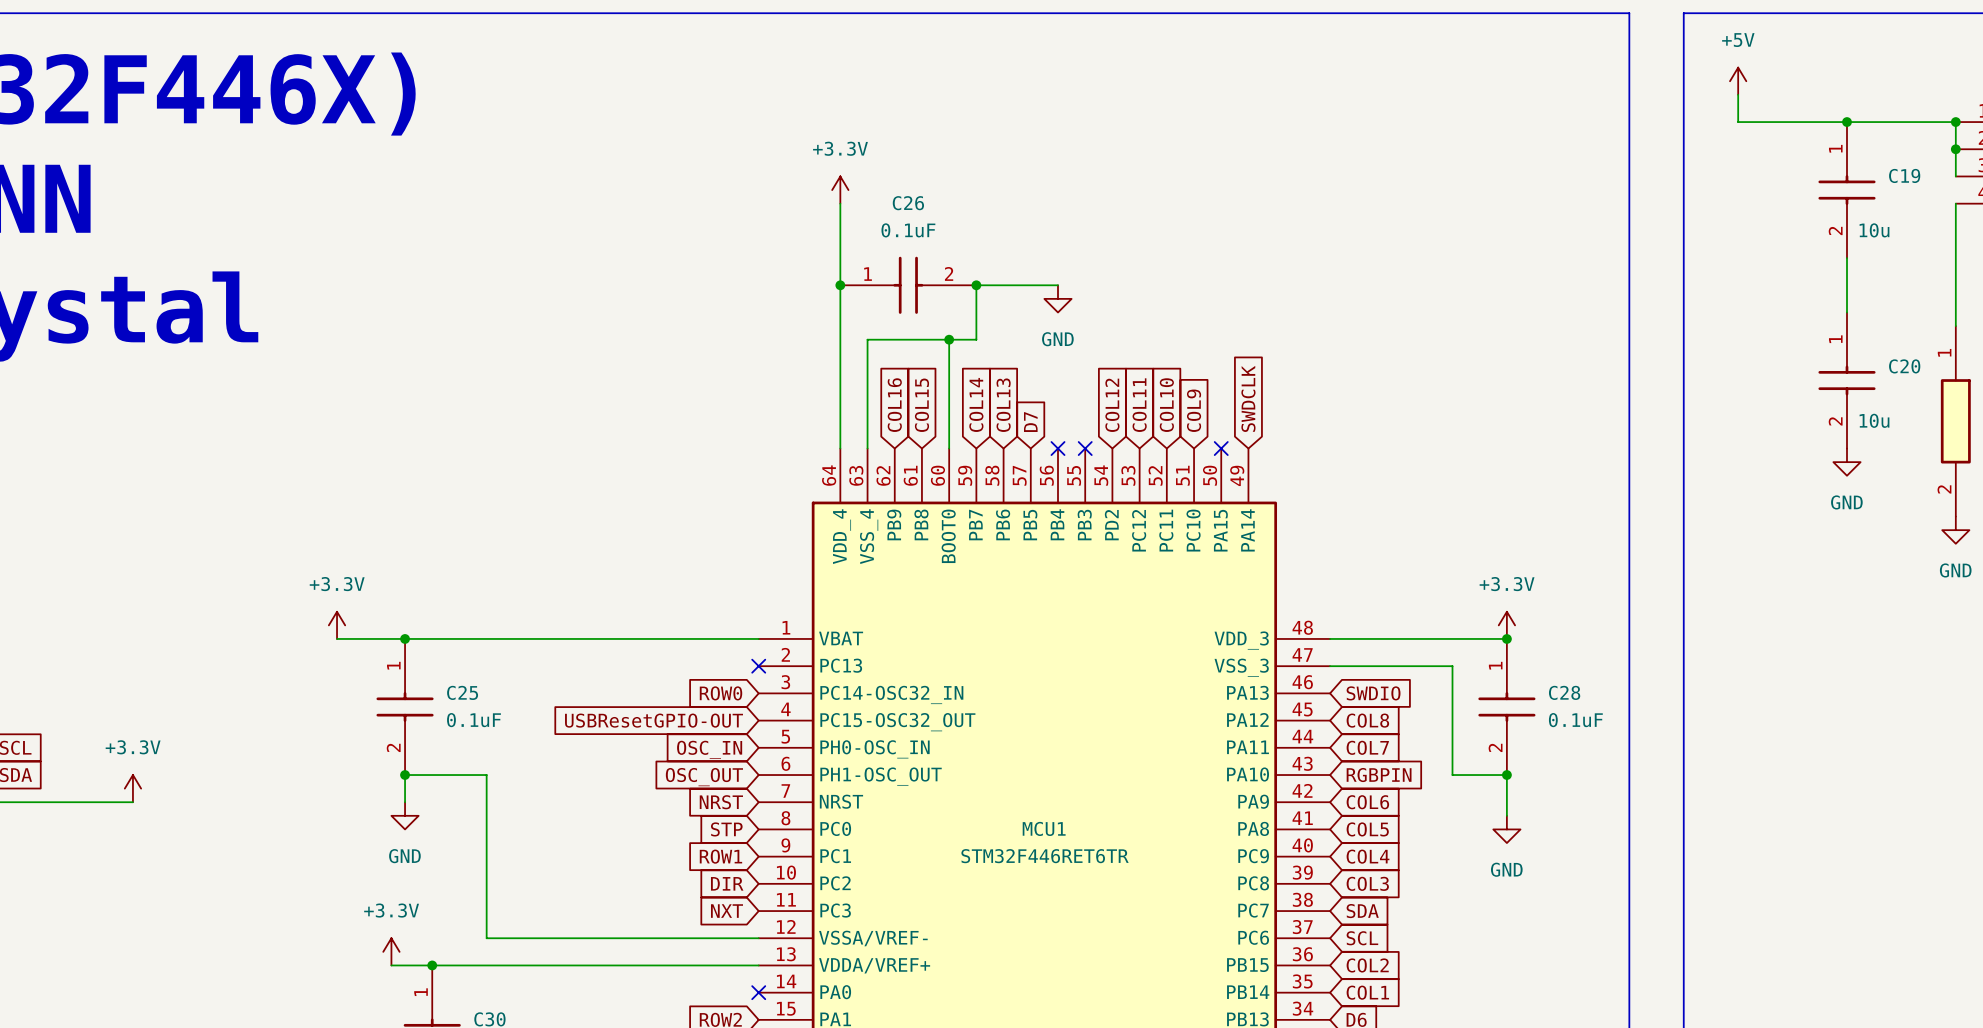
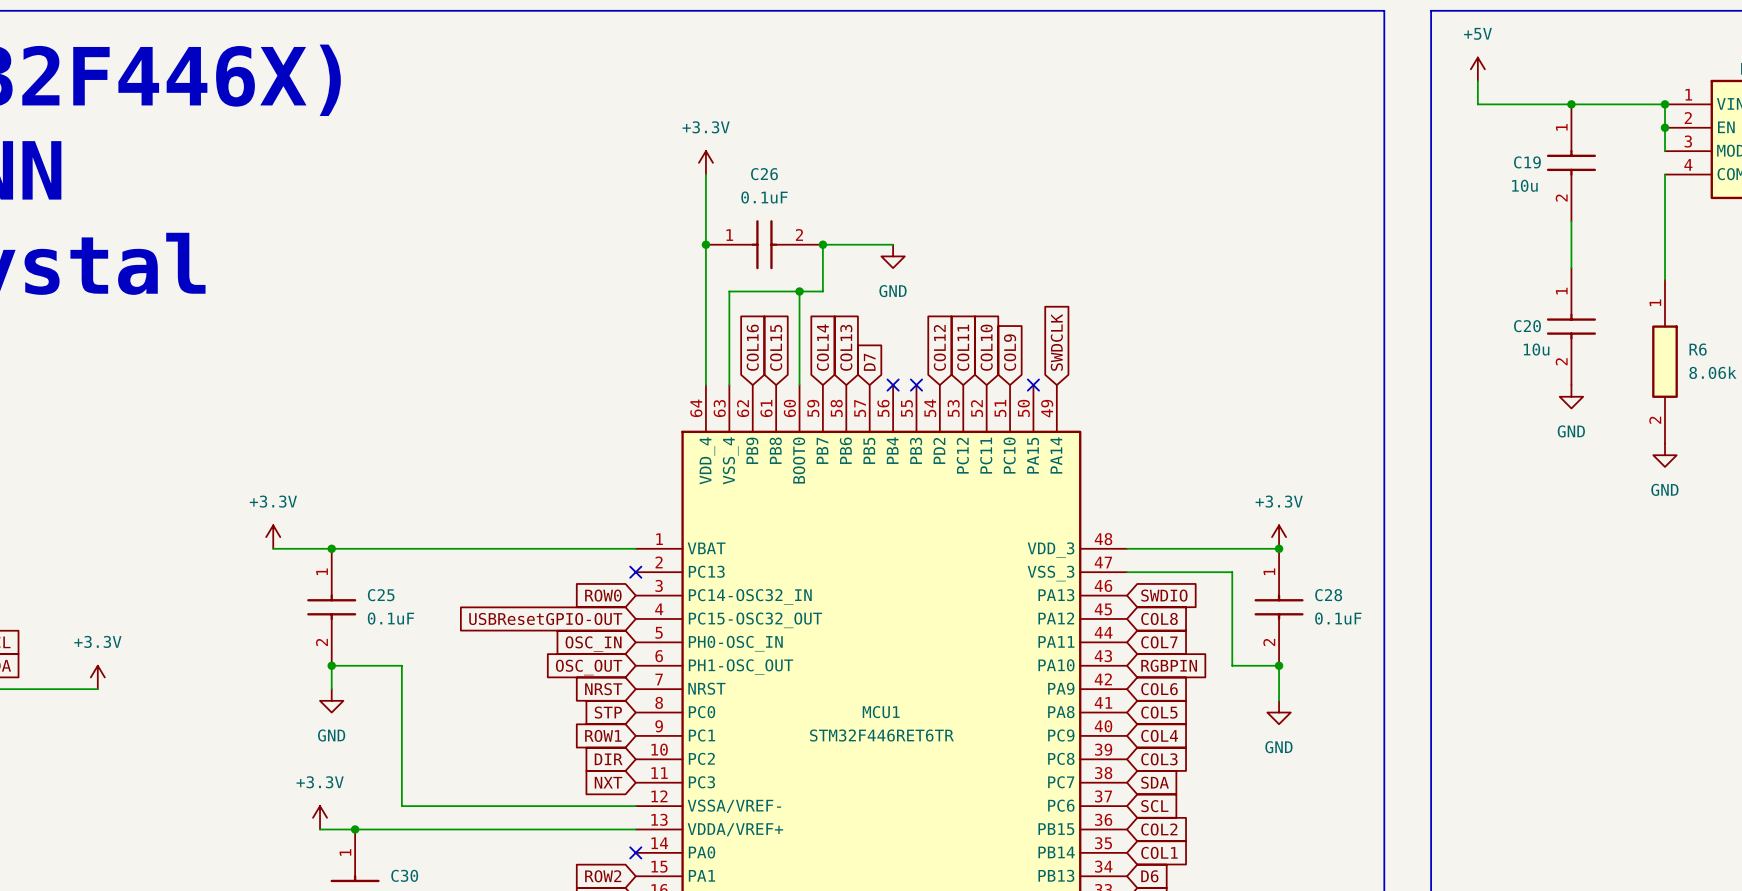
C19 name position: C19 (1904, 175) -> C19 (1527, 162)
C19 text position: 10u (1874, 230) -> 10u (1524, 185)
C20 name position: C20 (1904, 366) -> C20 (1527, 326)
C20 text position: 10u (1874, 420) -> 10u (1536, 349)

